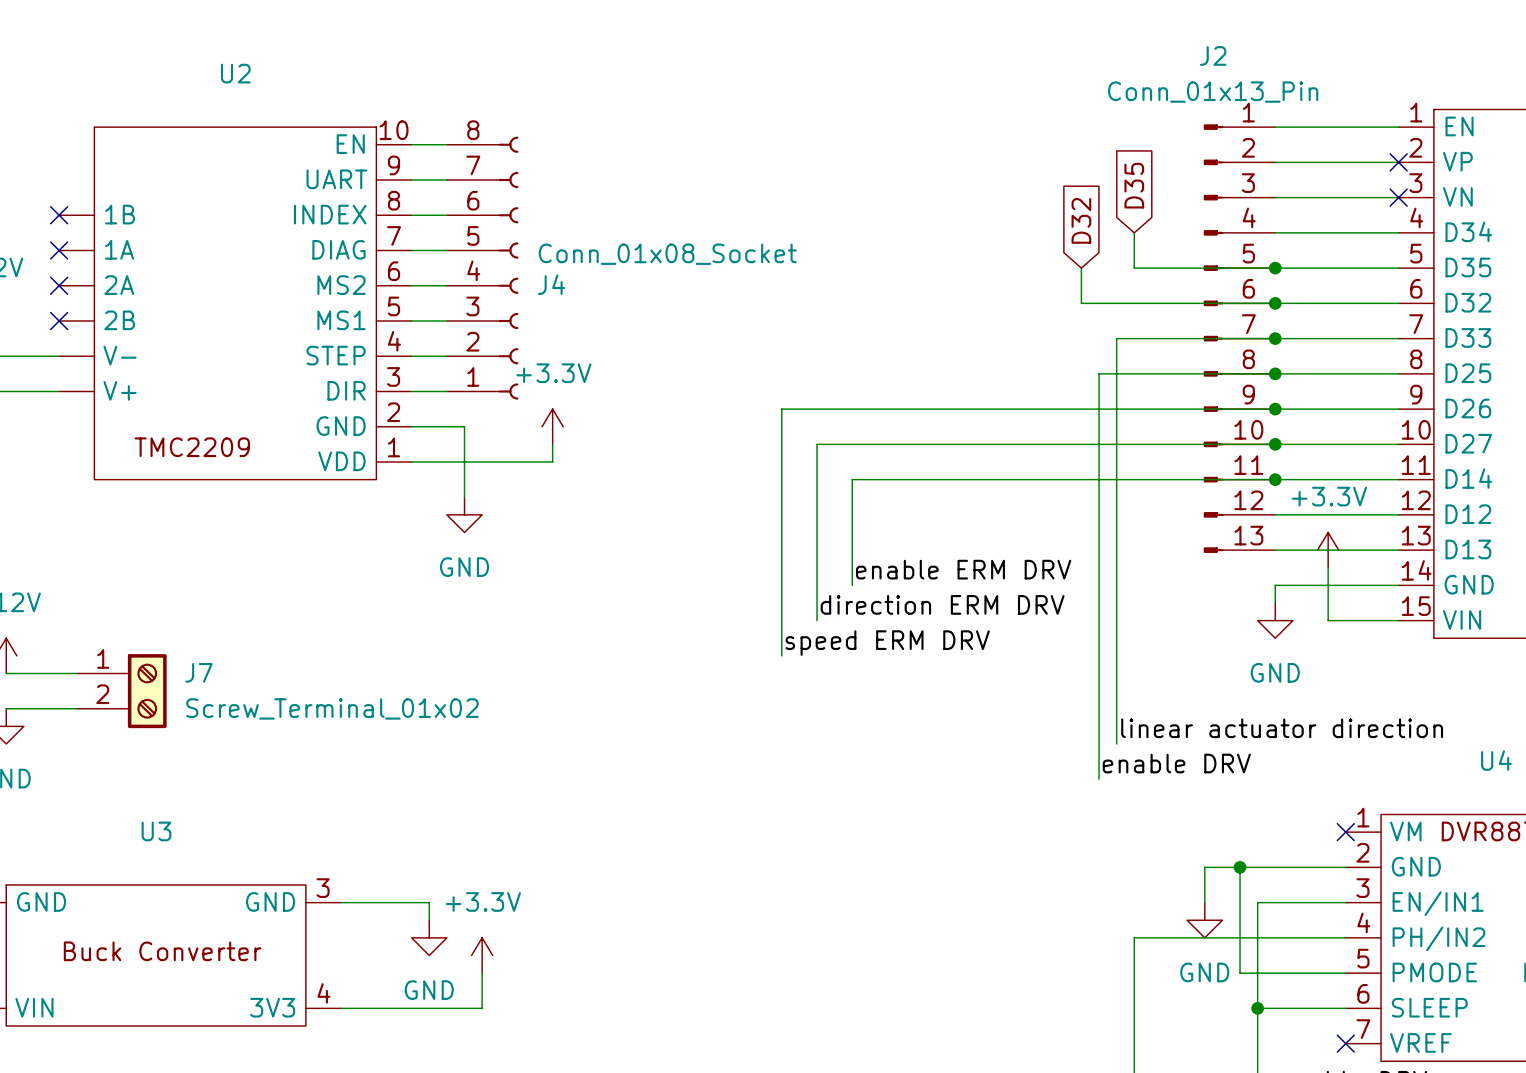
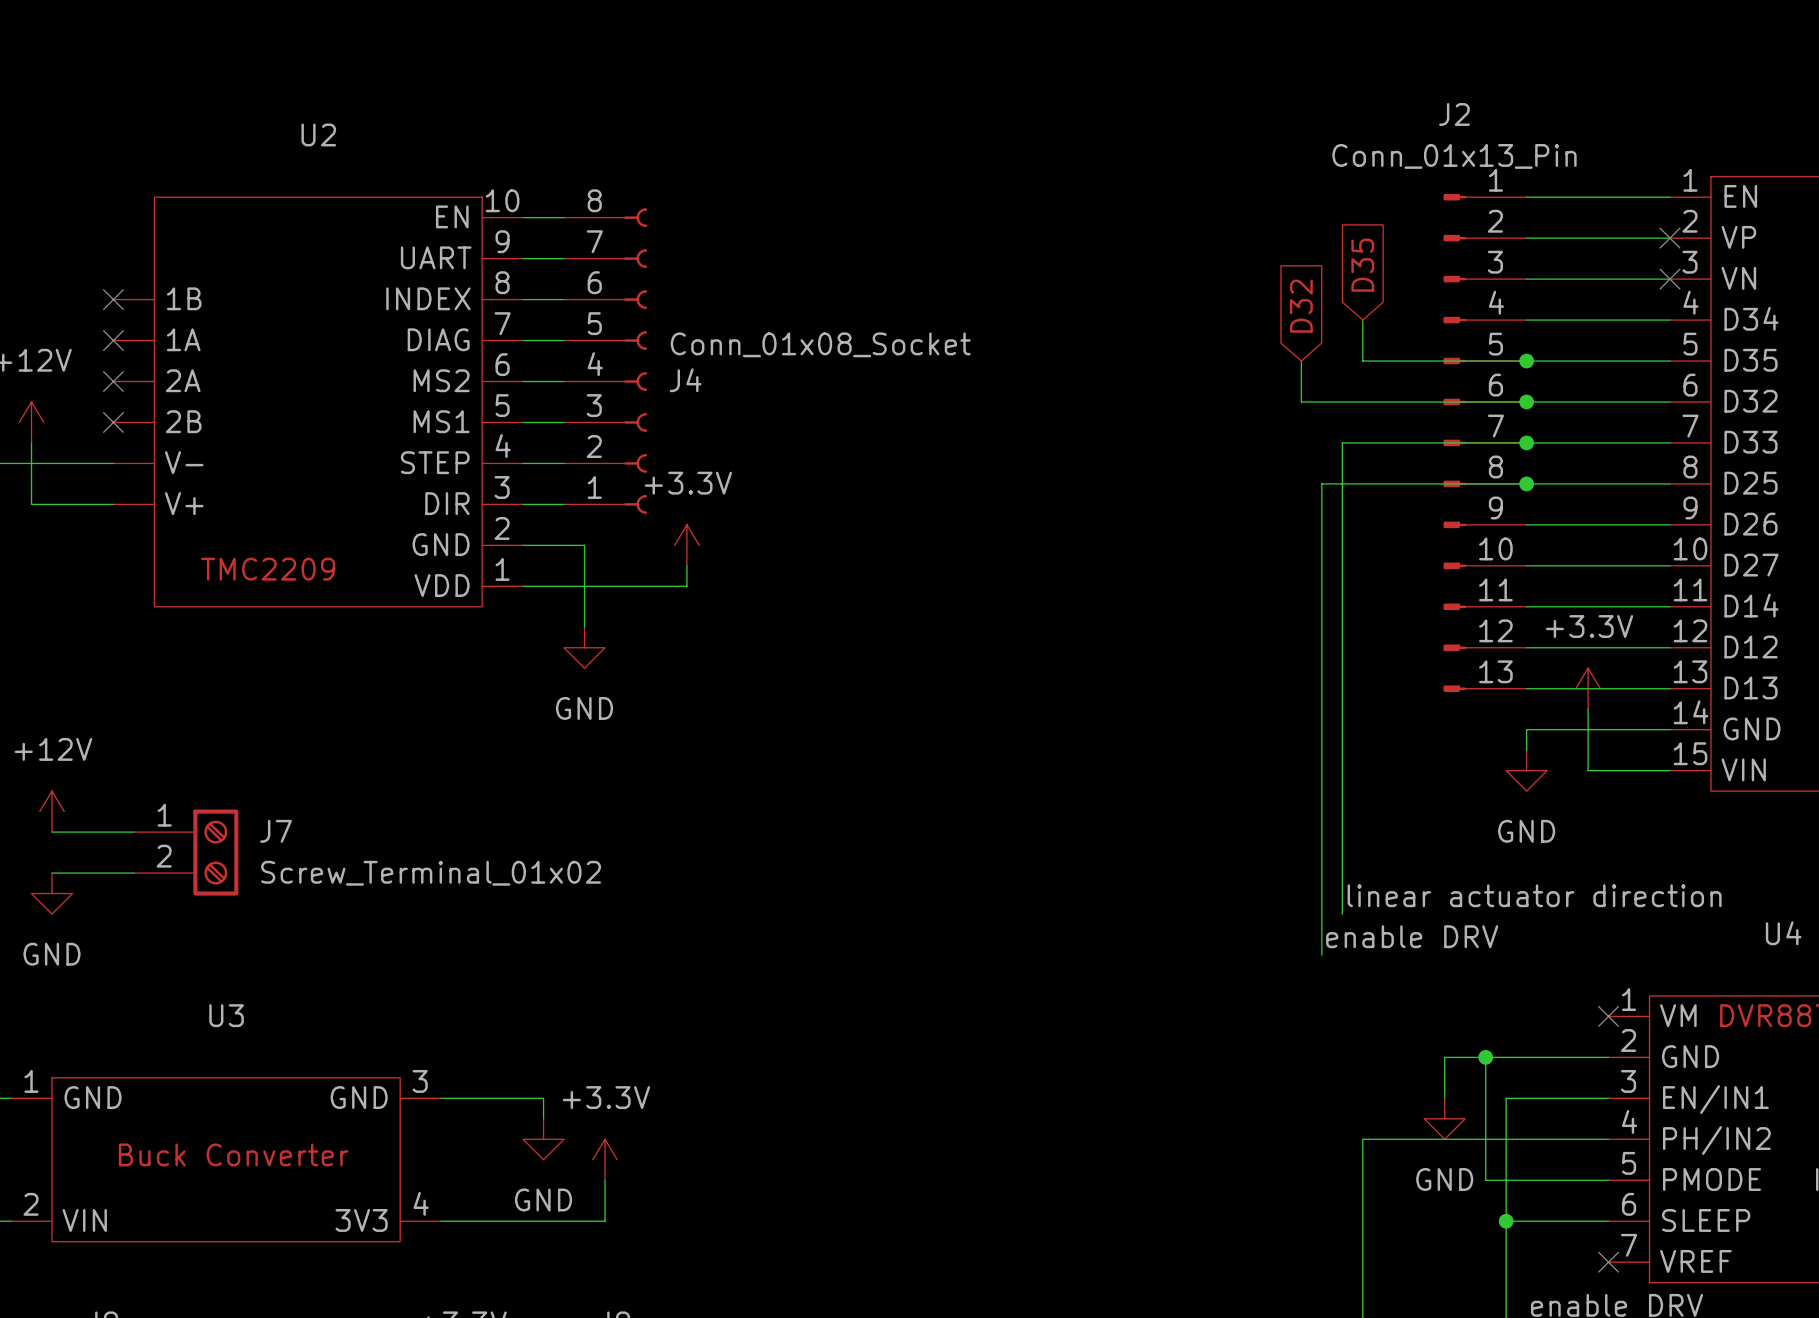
wire: (1275, 409) (781, 409) (781, 655) -> none
junction: (1275, 409) -> none
wire: (1275, 444) (817, 444) (817, 620) -> none
junction: (1275, 444) -> none
wire: (1275, 479) (852, 479) (852, 585) -> none
junction: (1275, 479) -> none
label: enable ERM DRV (963, 569) -> none
label: direction ERM DRV (942, 604) -> none
label: speed ERM DRV (887, 643) -> none

